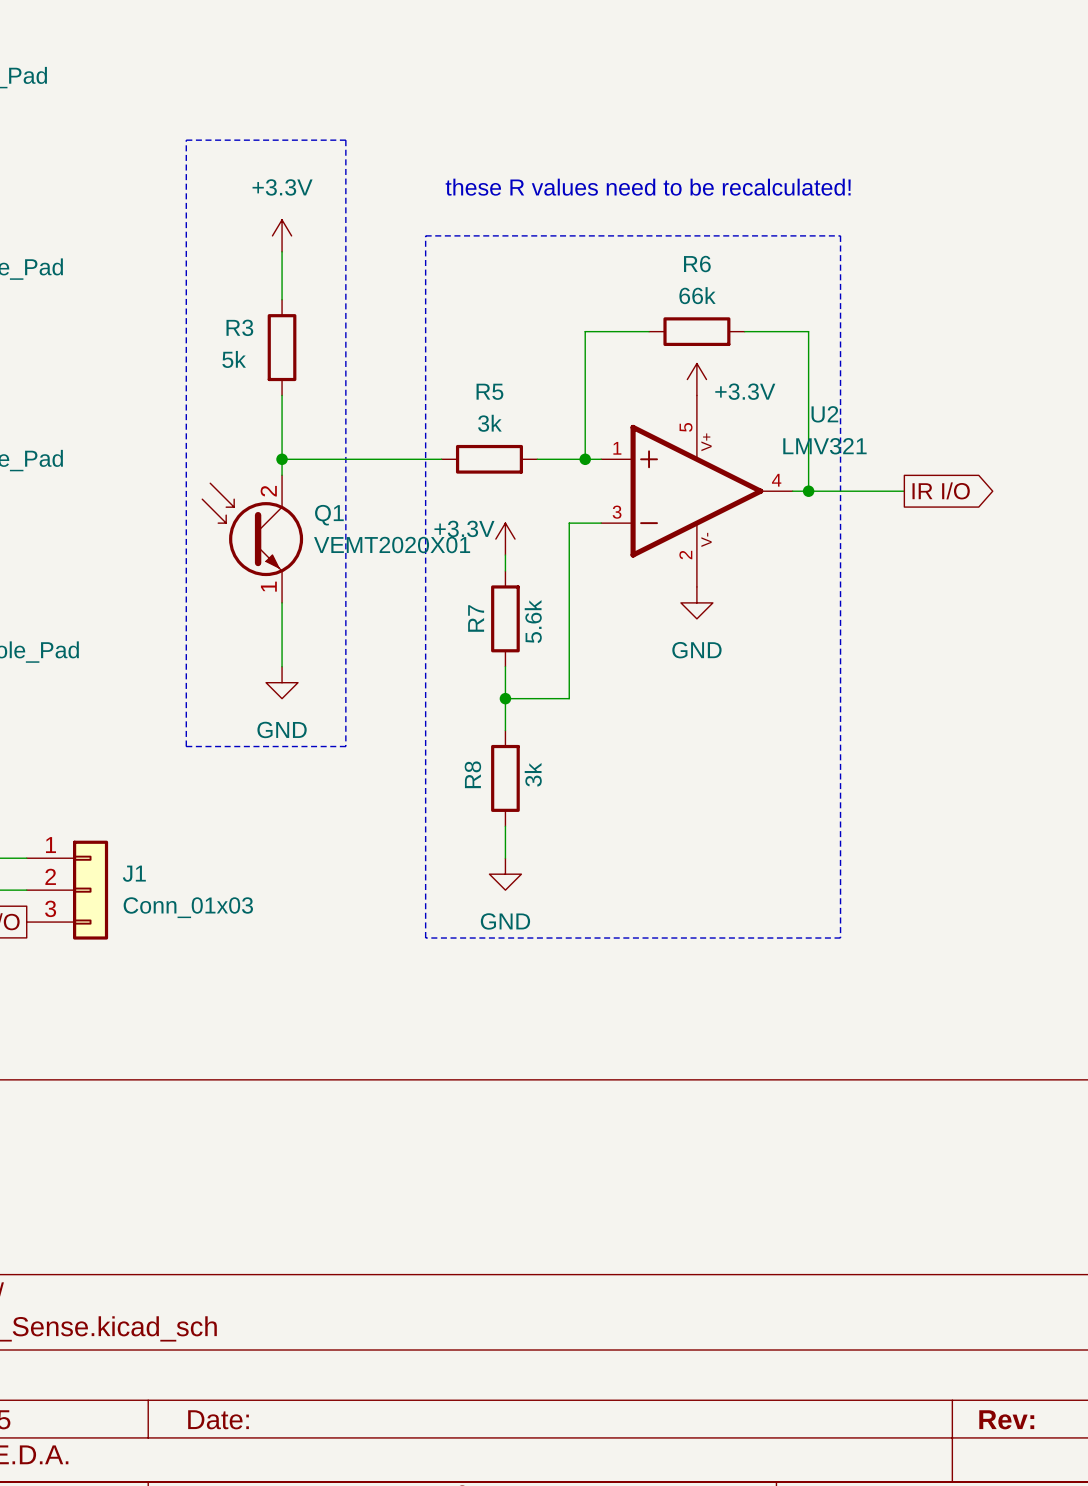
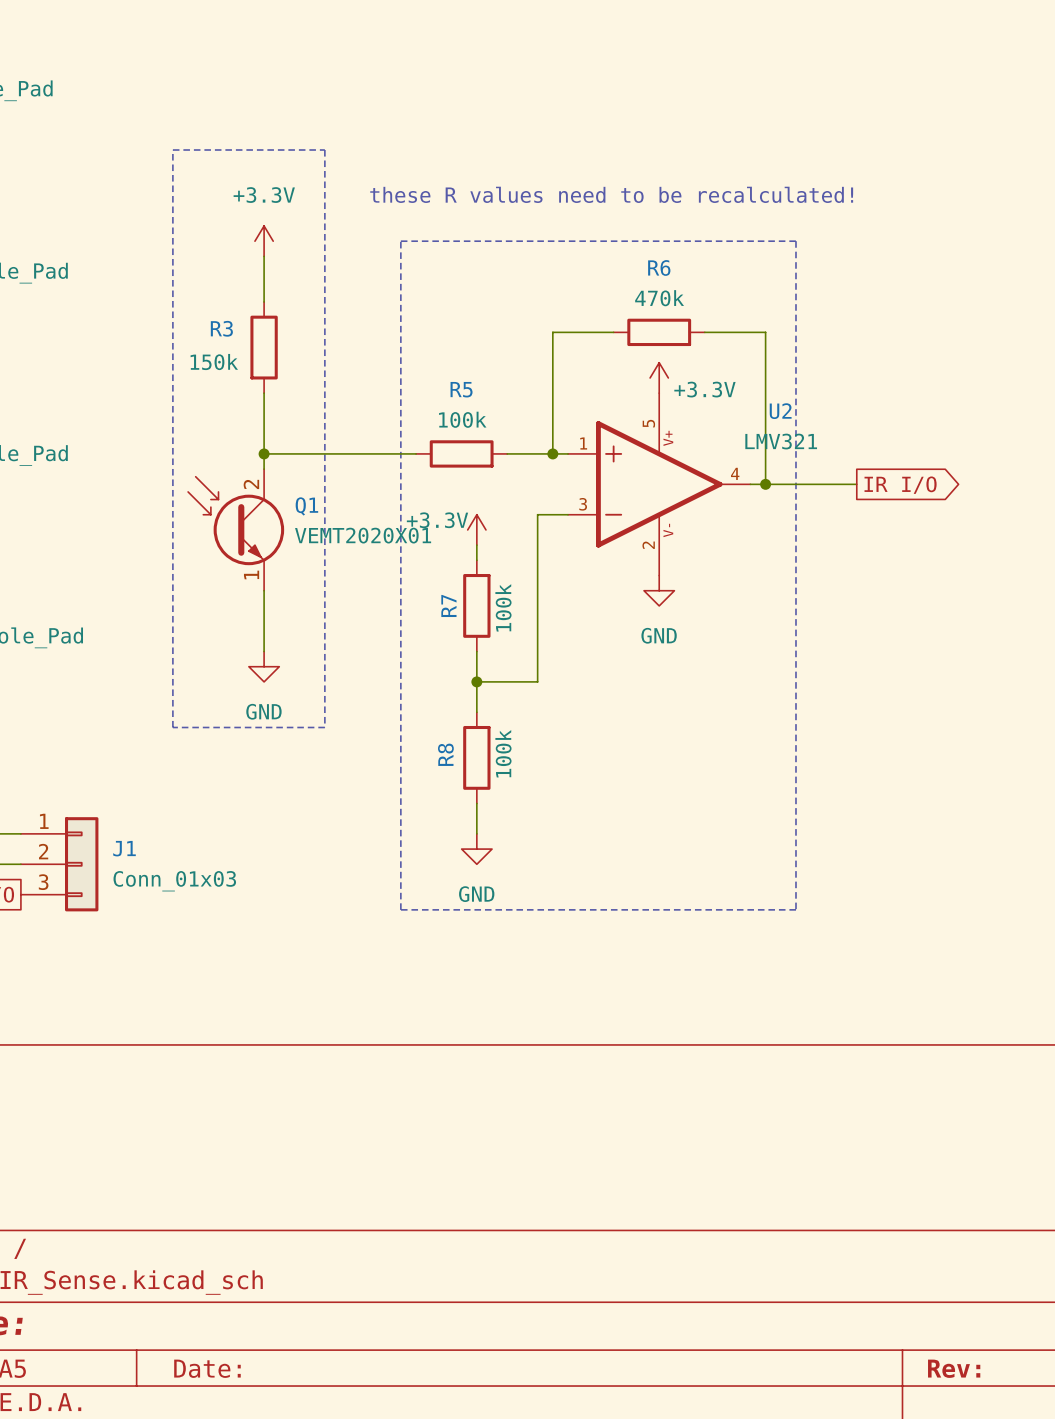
R6 value: 66k (697, 295) -> 470k (659, 298)
R3 value: 5k (234, 359) -> 150k (214, 362)
R5 value: 3k (489, 423) -> 100k (462, 419)
R7 value: 5.6k (533, 621) -> 100k (503, 607)
R8 value: 3k (533, 774) -> 100k (503, 753)

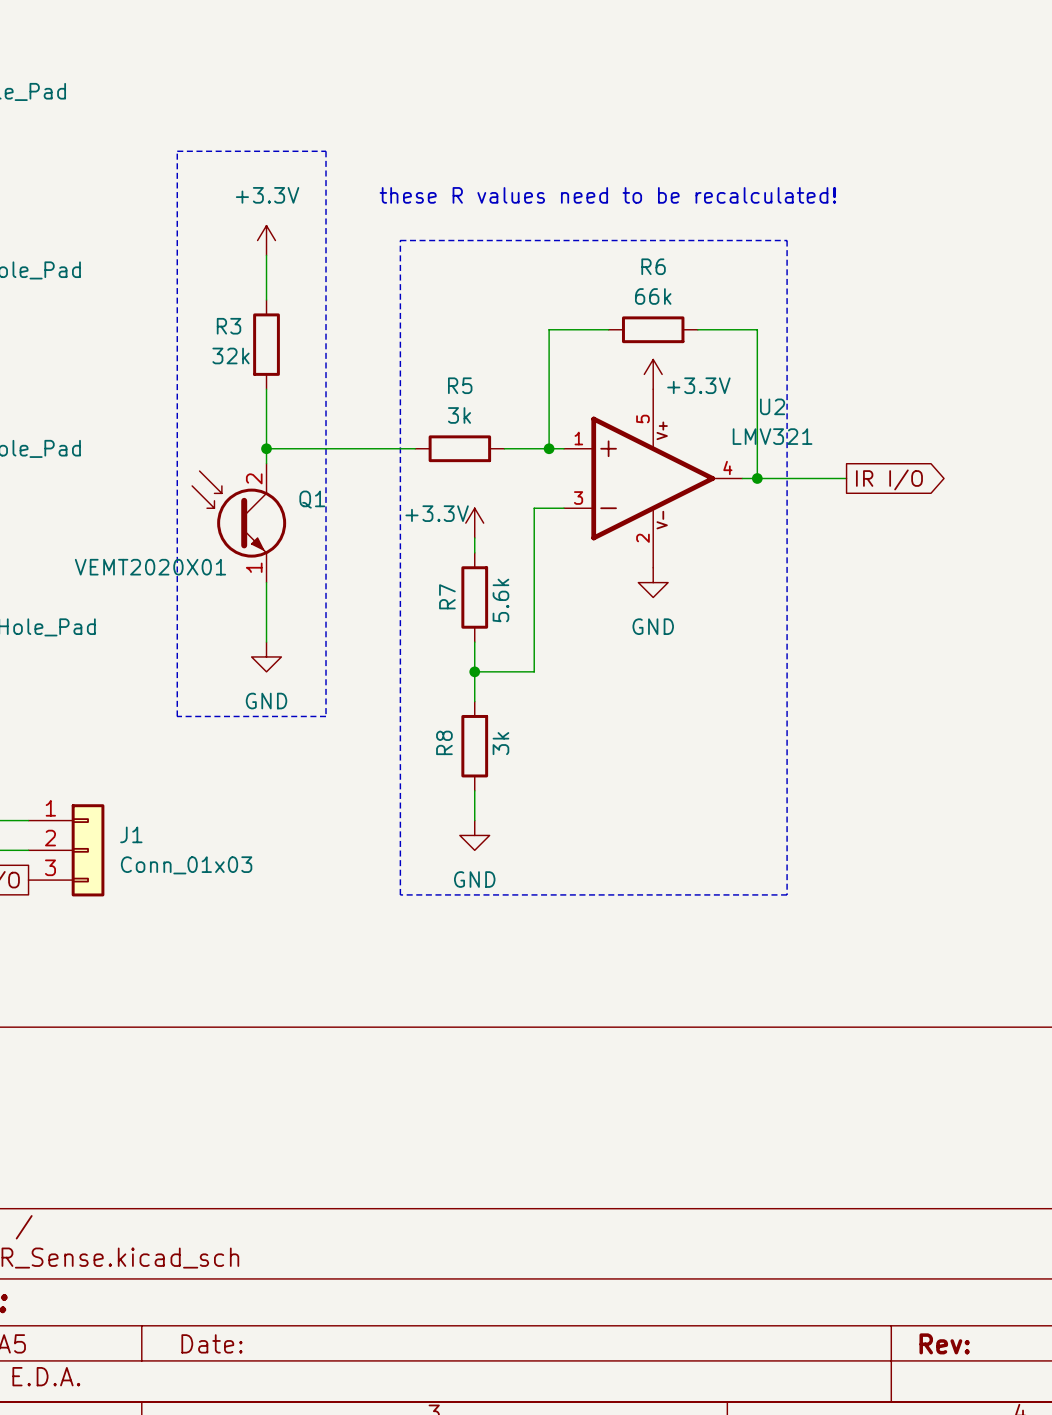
R6 value: 470k (659, 298) -> 66k (653, 296)
R3 value: 150k (214, 362) -> 32k (231, 355)
R5 value: 100k (462, 419) -> 3k (459, 415)
Q1 value position: VEMT2020X01 (363, 535) -> VEMT2020X01 (150, 567)
R7 value: 100k (503, 607) -> 5.6k (500, 600)
R8 value: 100k (503, 753) -> 3k (500, 743)

